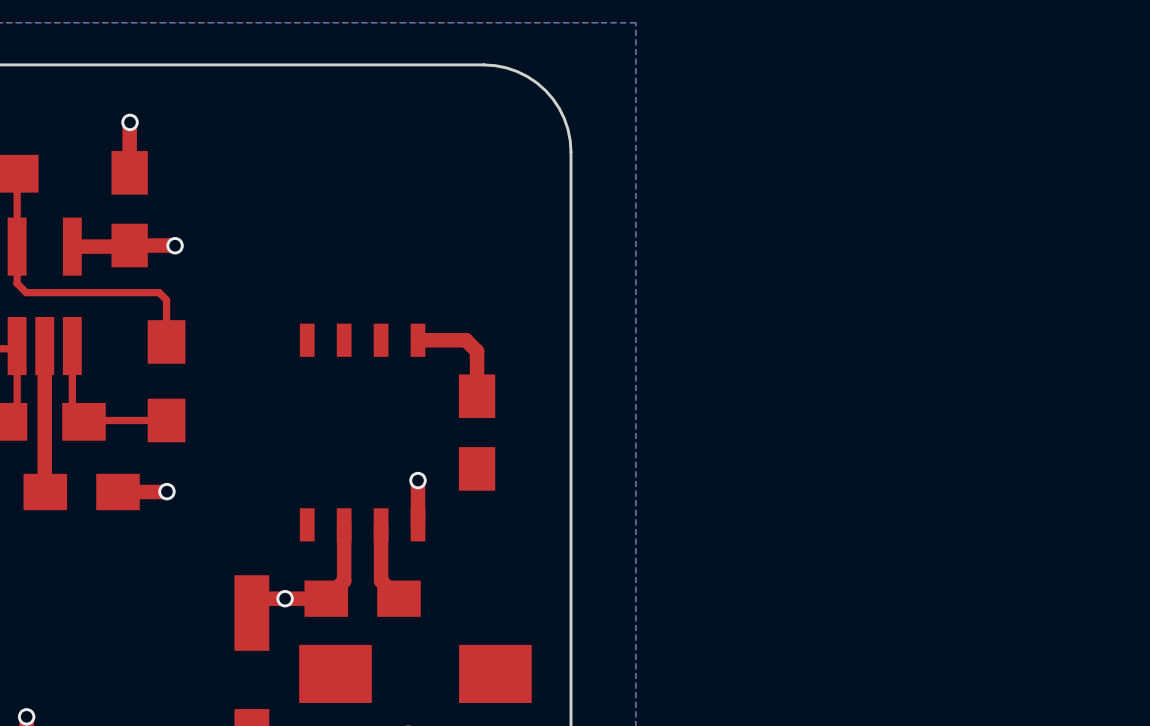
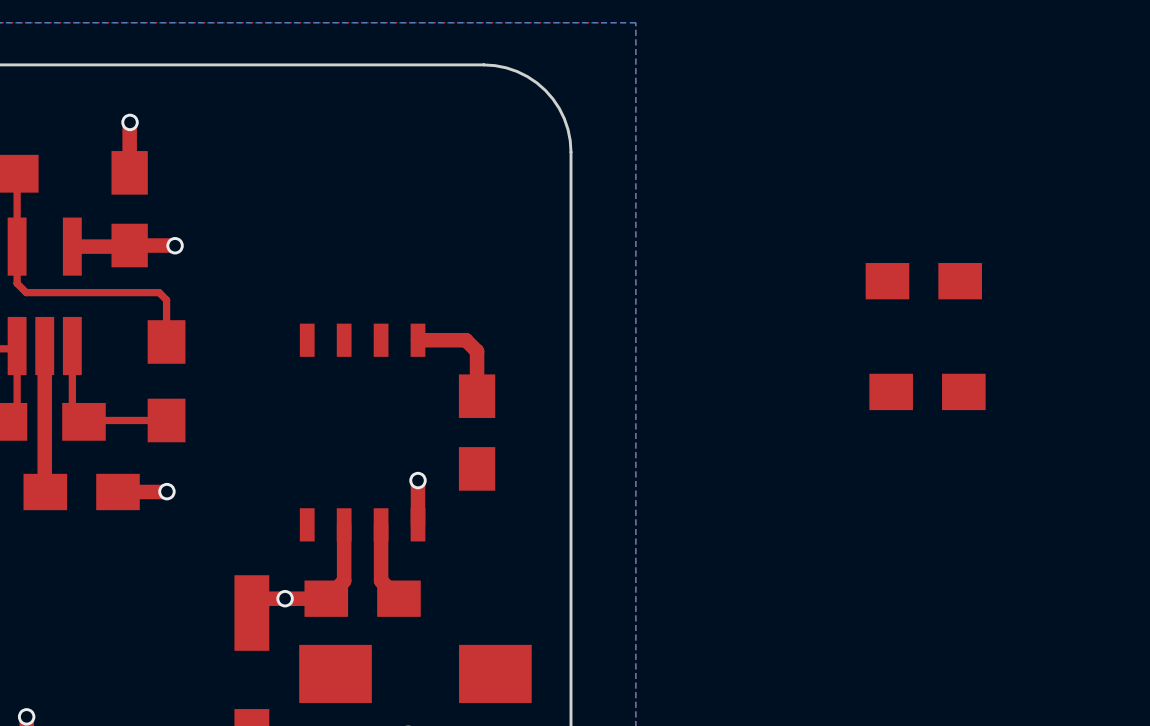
part: none -> (923, 281)
part: none -> (927, 391)

